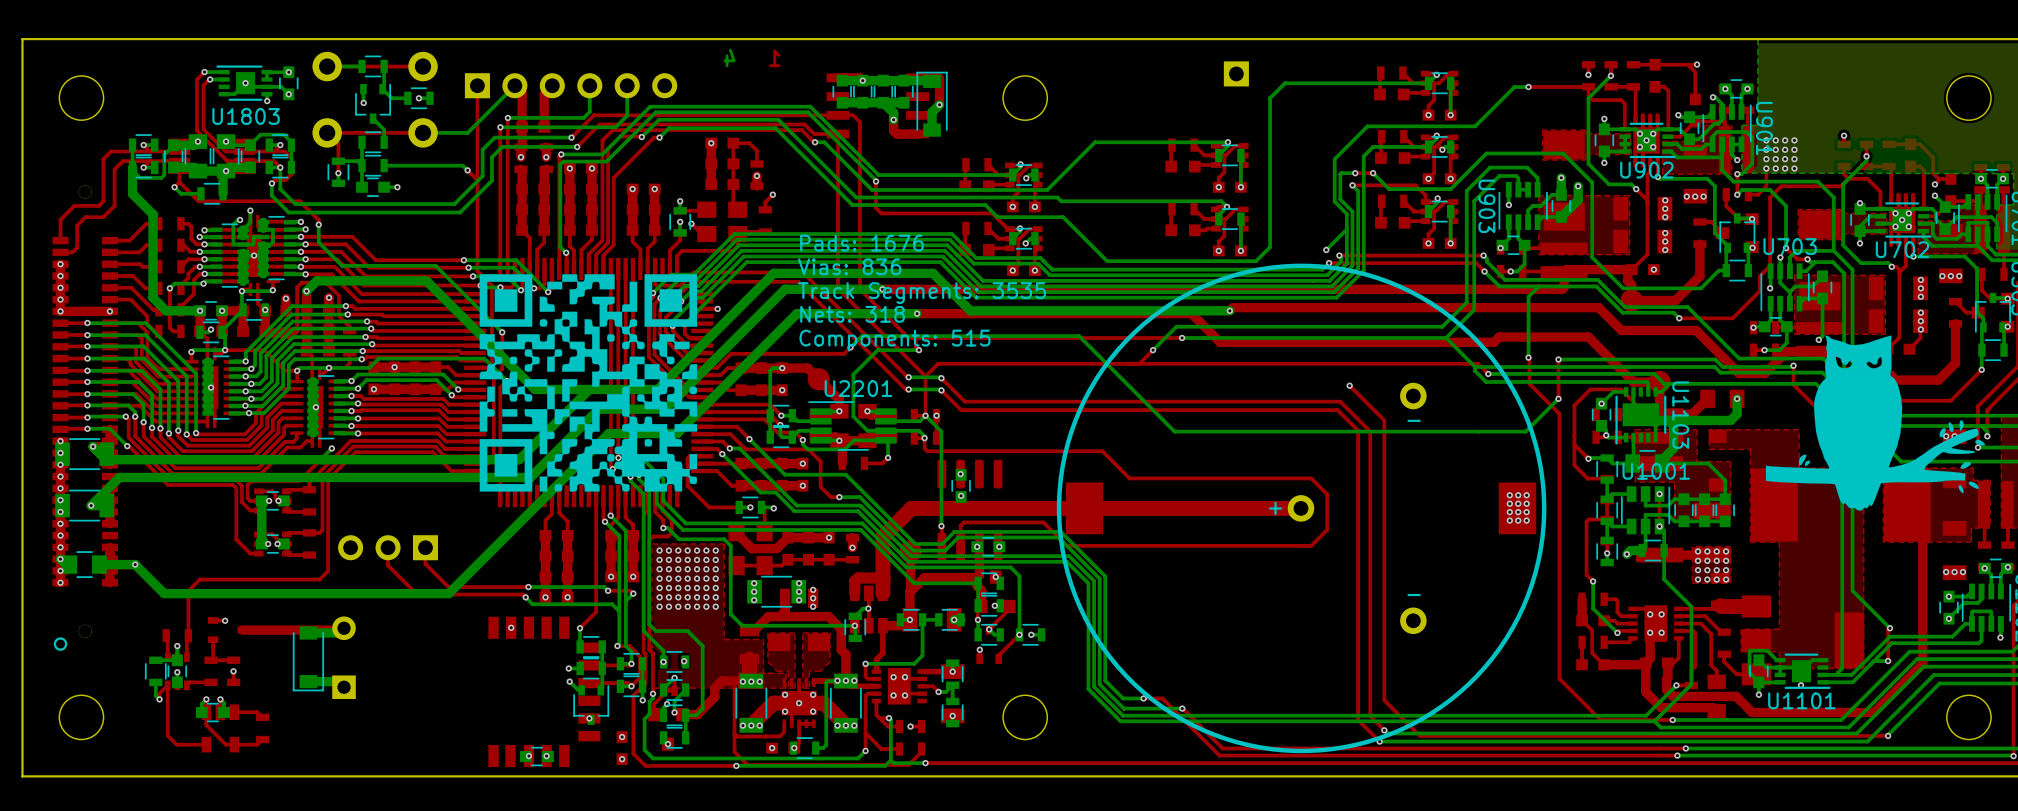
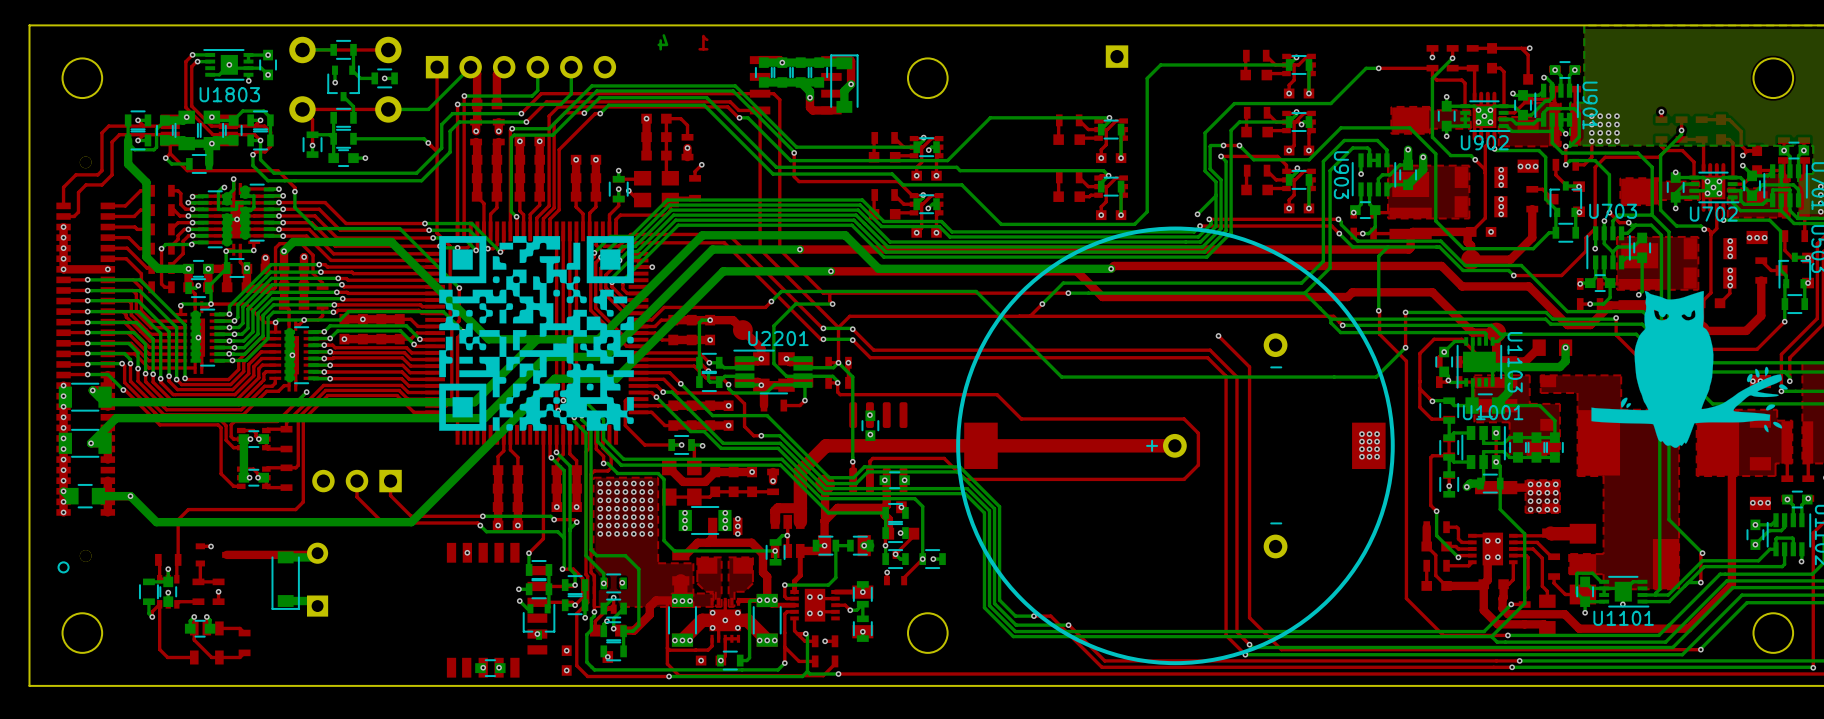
text: Pads: 1676 (862, 243) -> none
text: Vias: 836 (849, 266) -> none
text: Track Segments: 3535 (922, 293) -> none
text: Nets: 318 (852, 314) -> none
text: Components: 515 (895, 340) -> none

